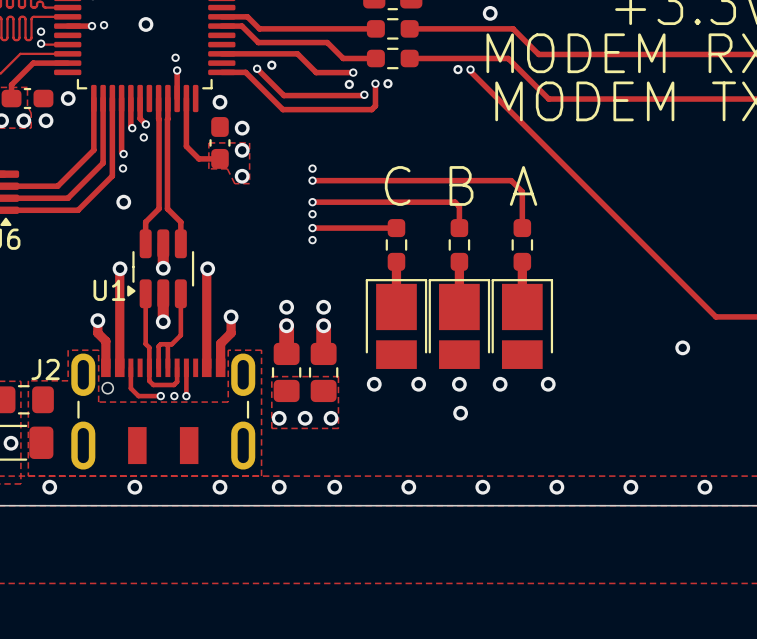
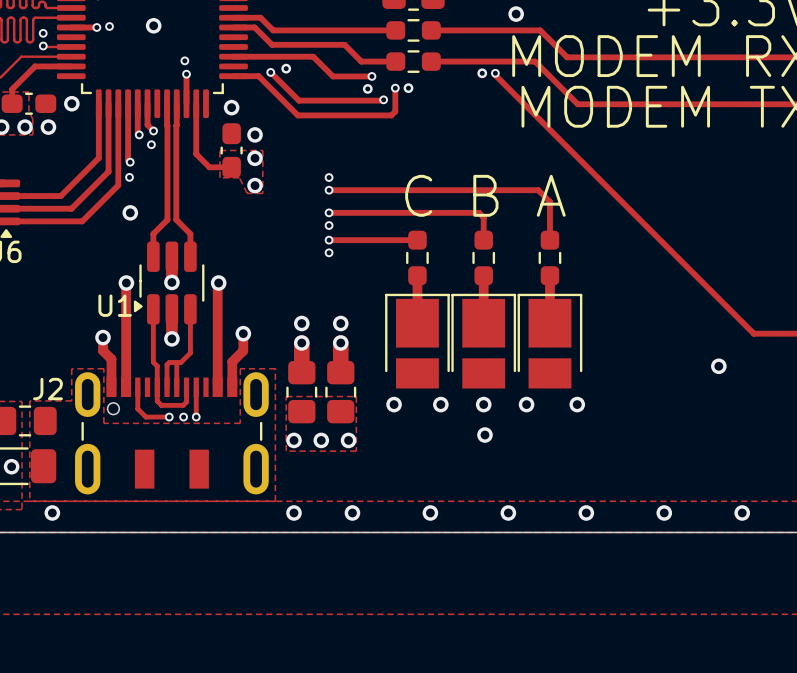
via: (134, 487) -> none
via: (219, 487) -> none

